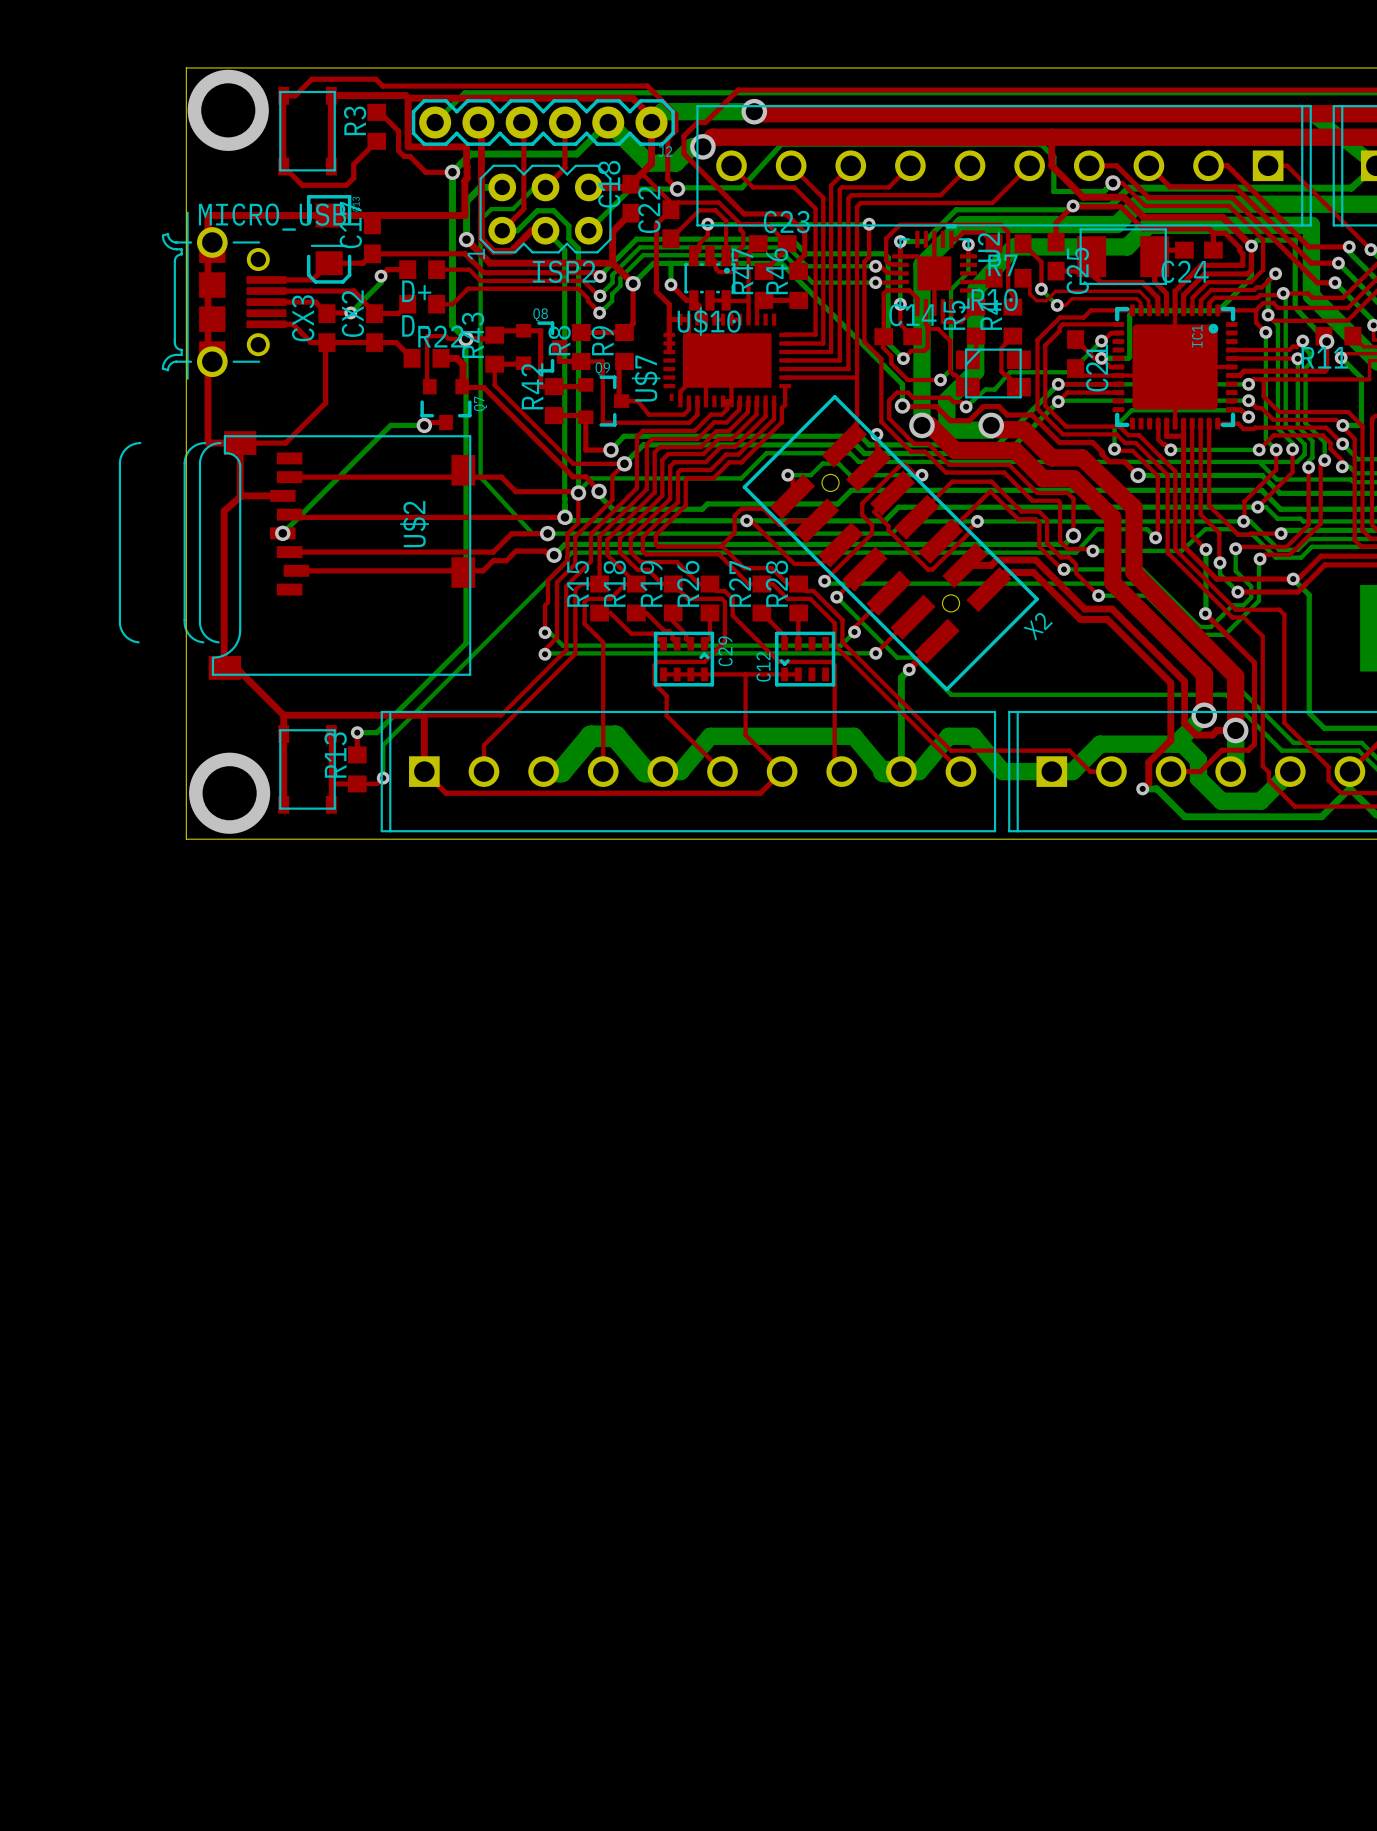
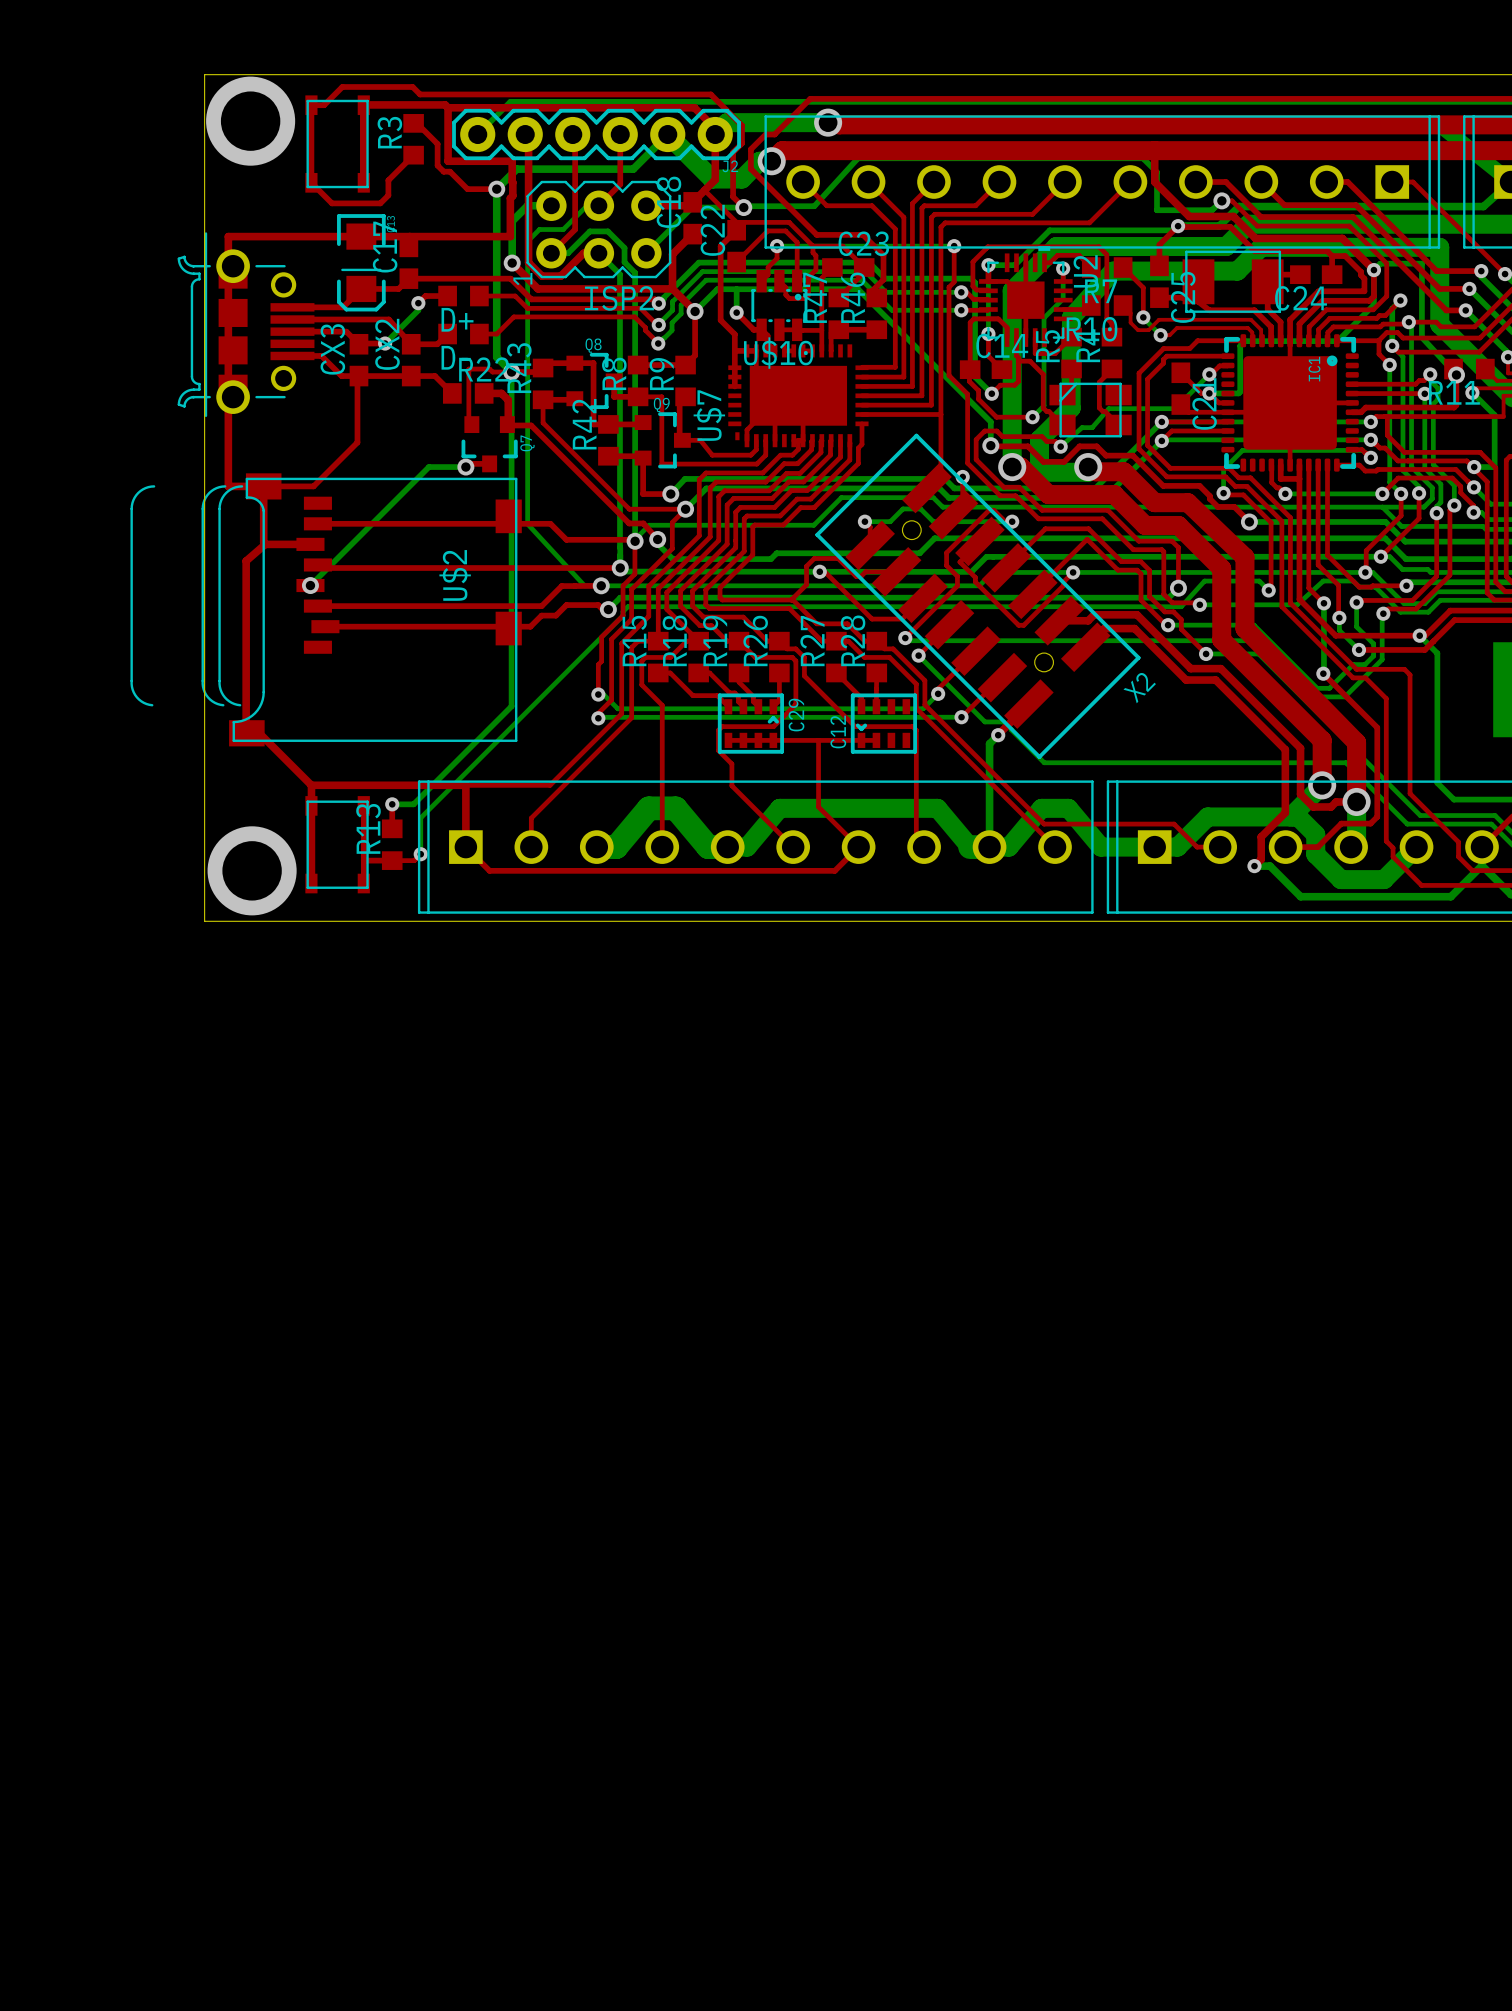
MICRO_USB: (224, 295) -> none
part: none -> (246, 324)

